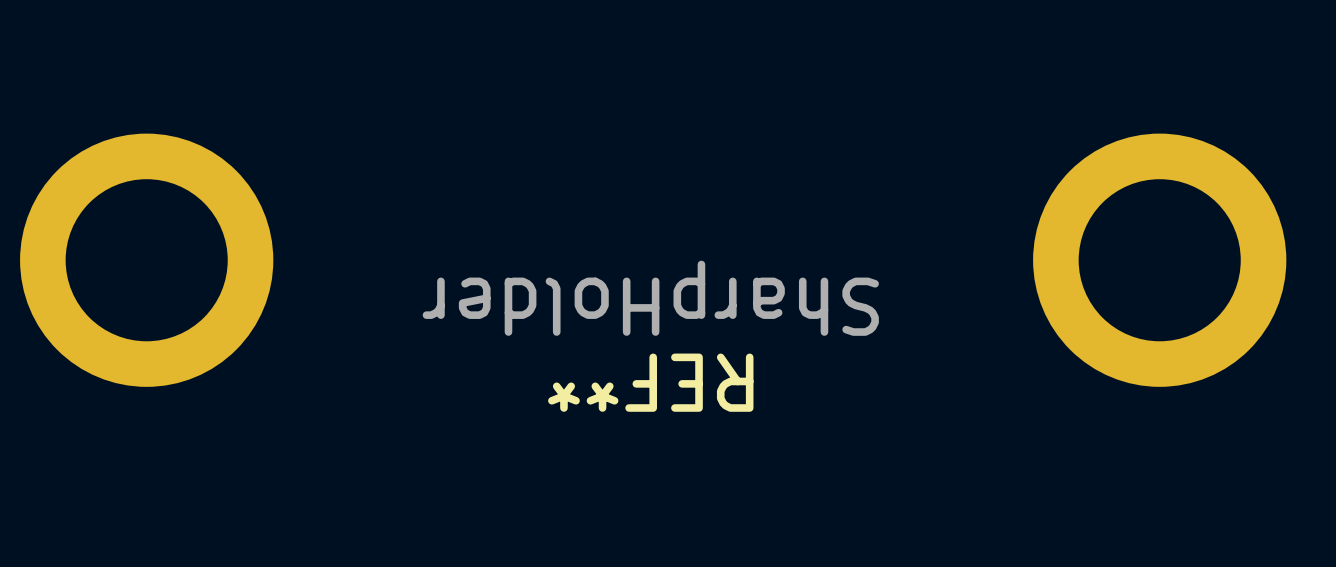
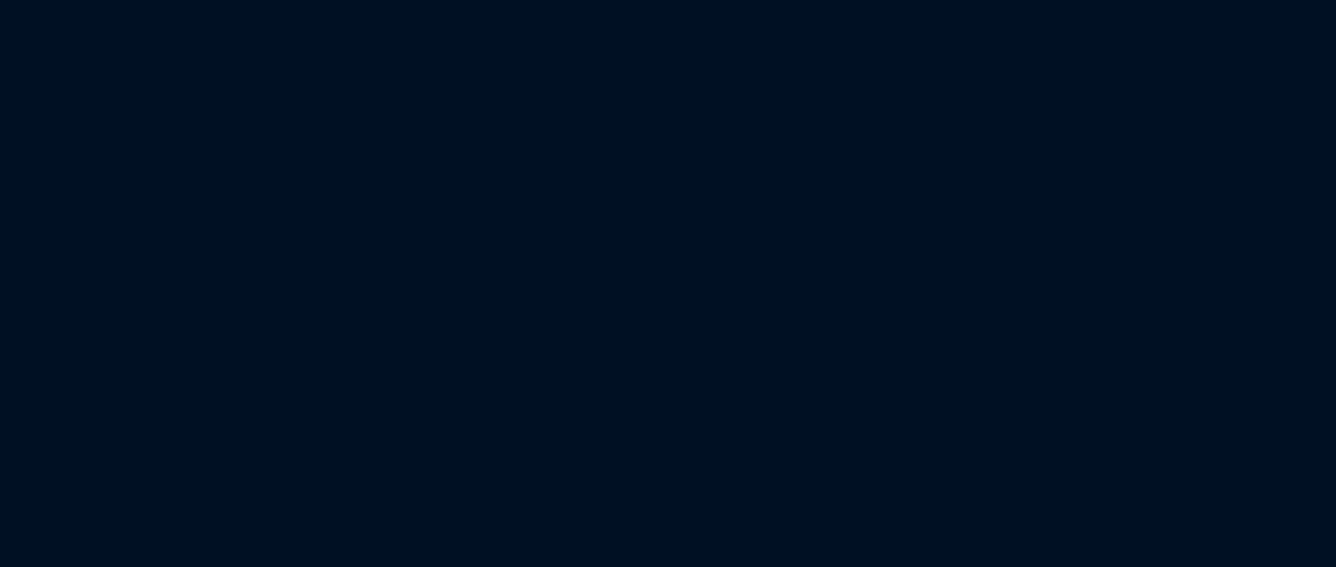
REF**: SharpHolder (653, 260) -> none

